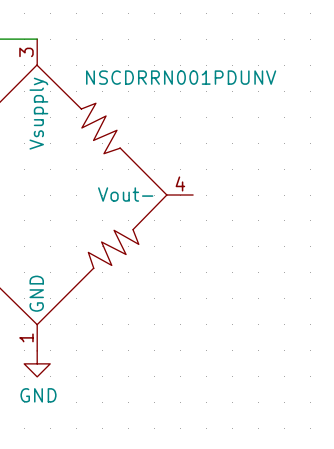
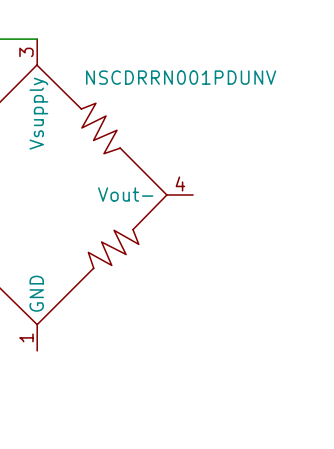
power symbol: GND (37, 363) -> none

